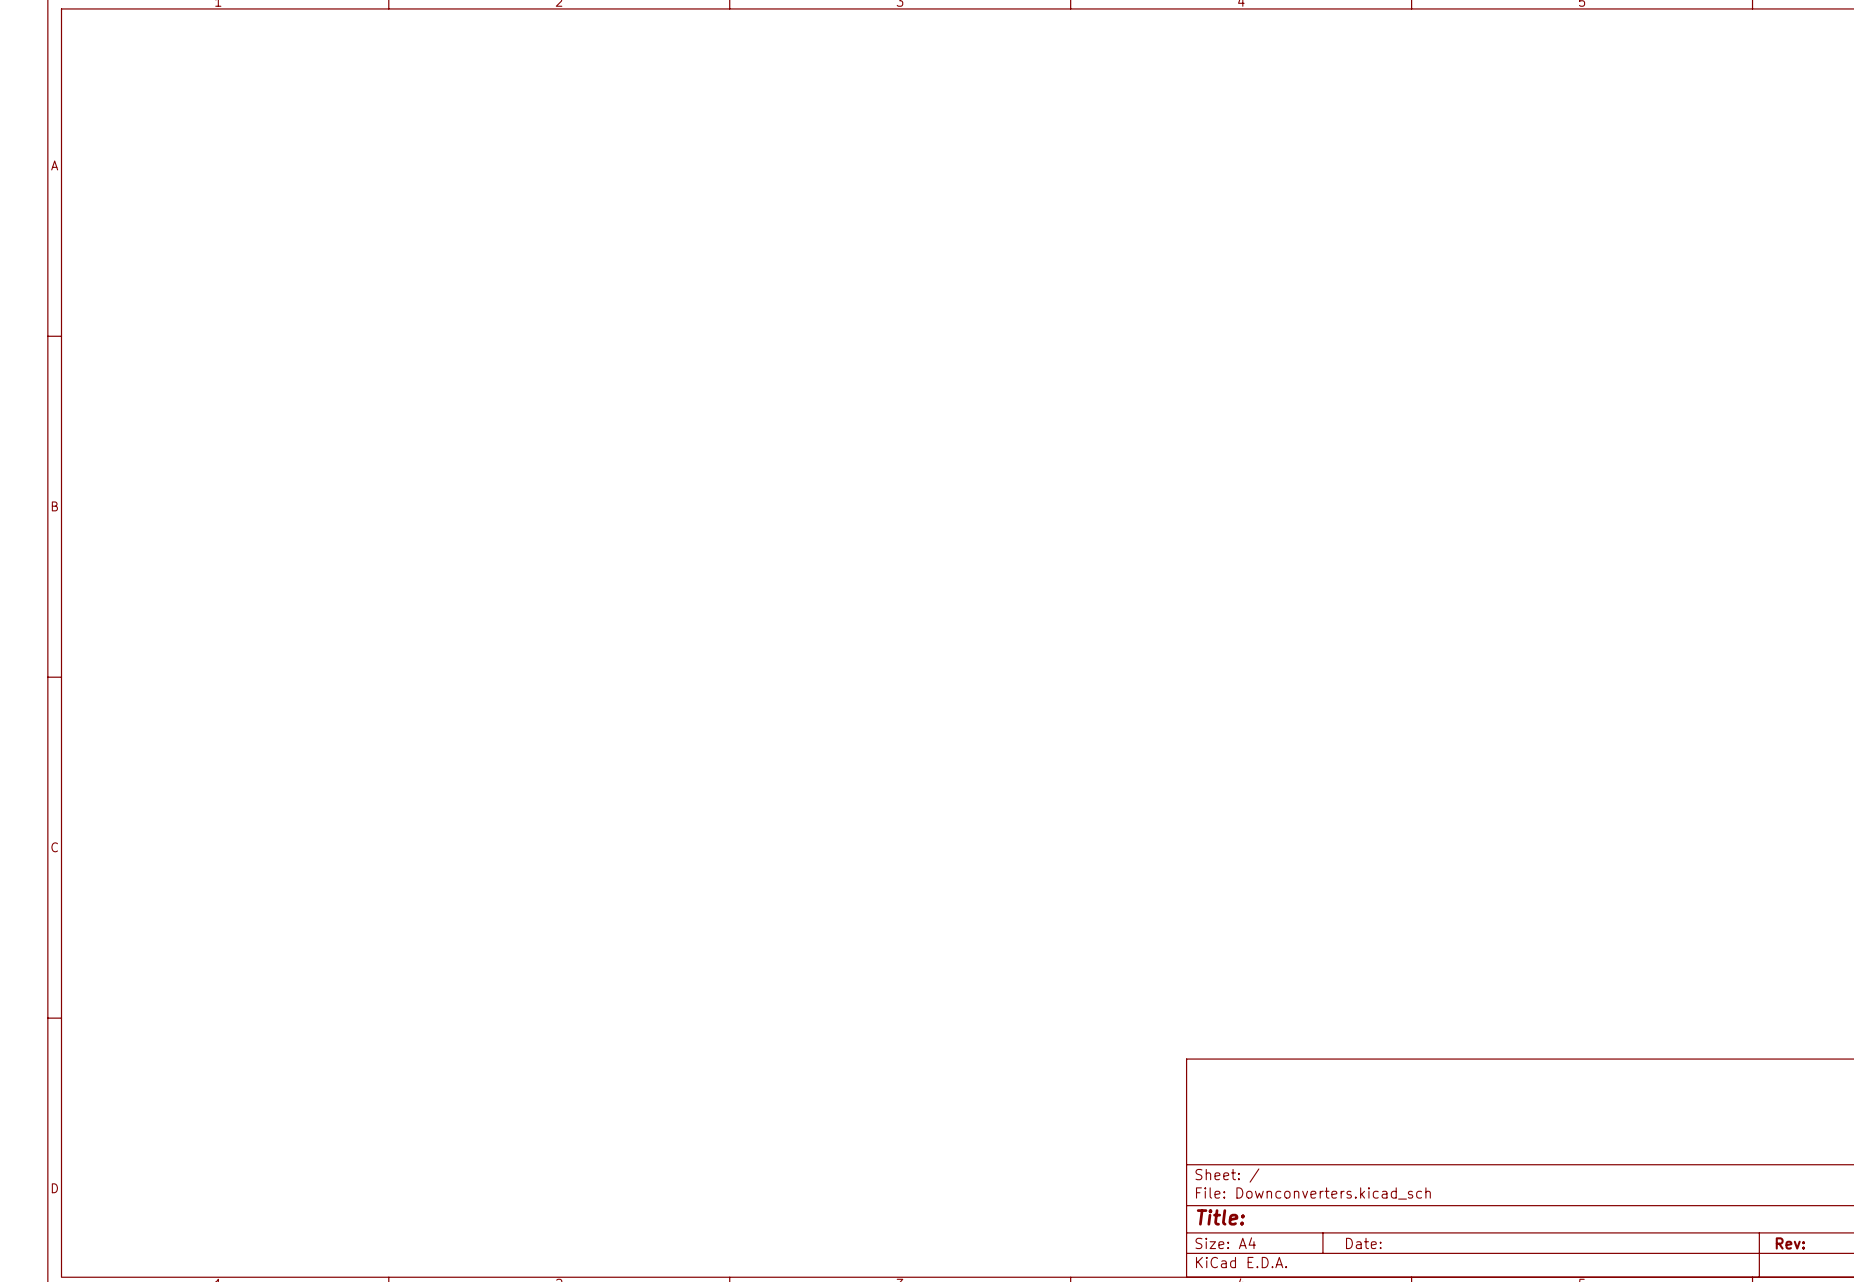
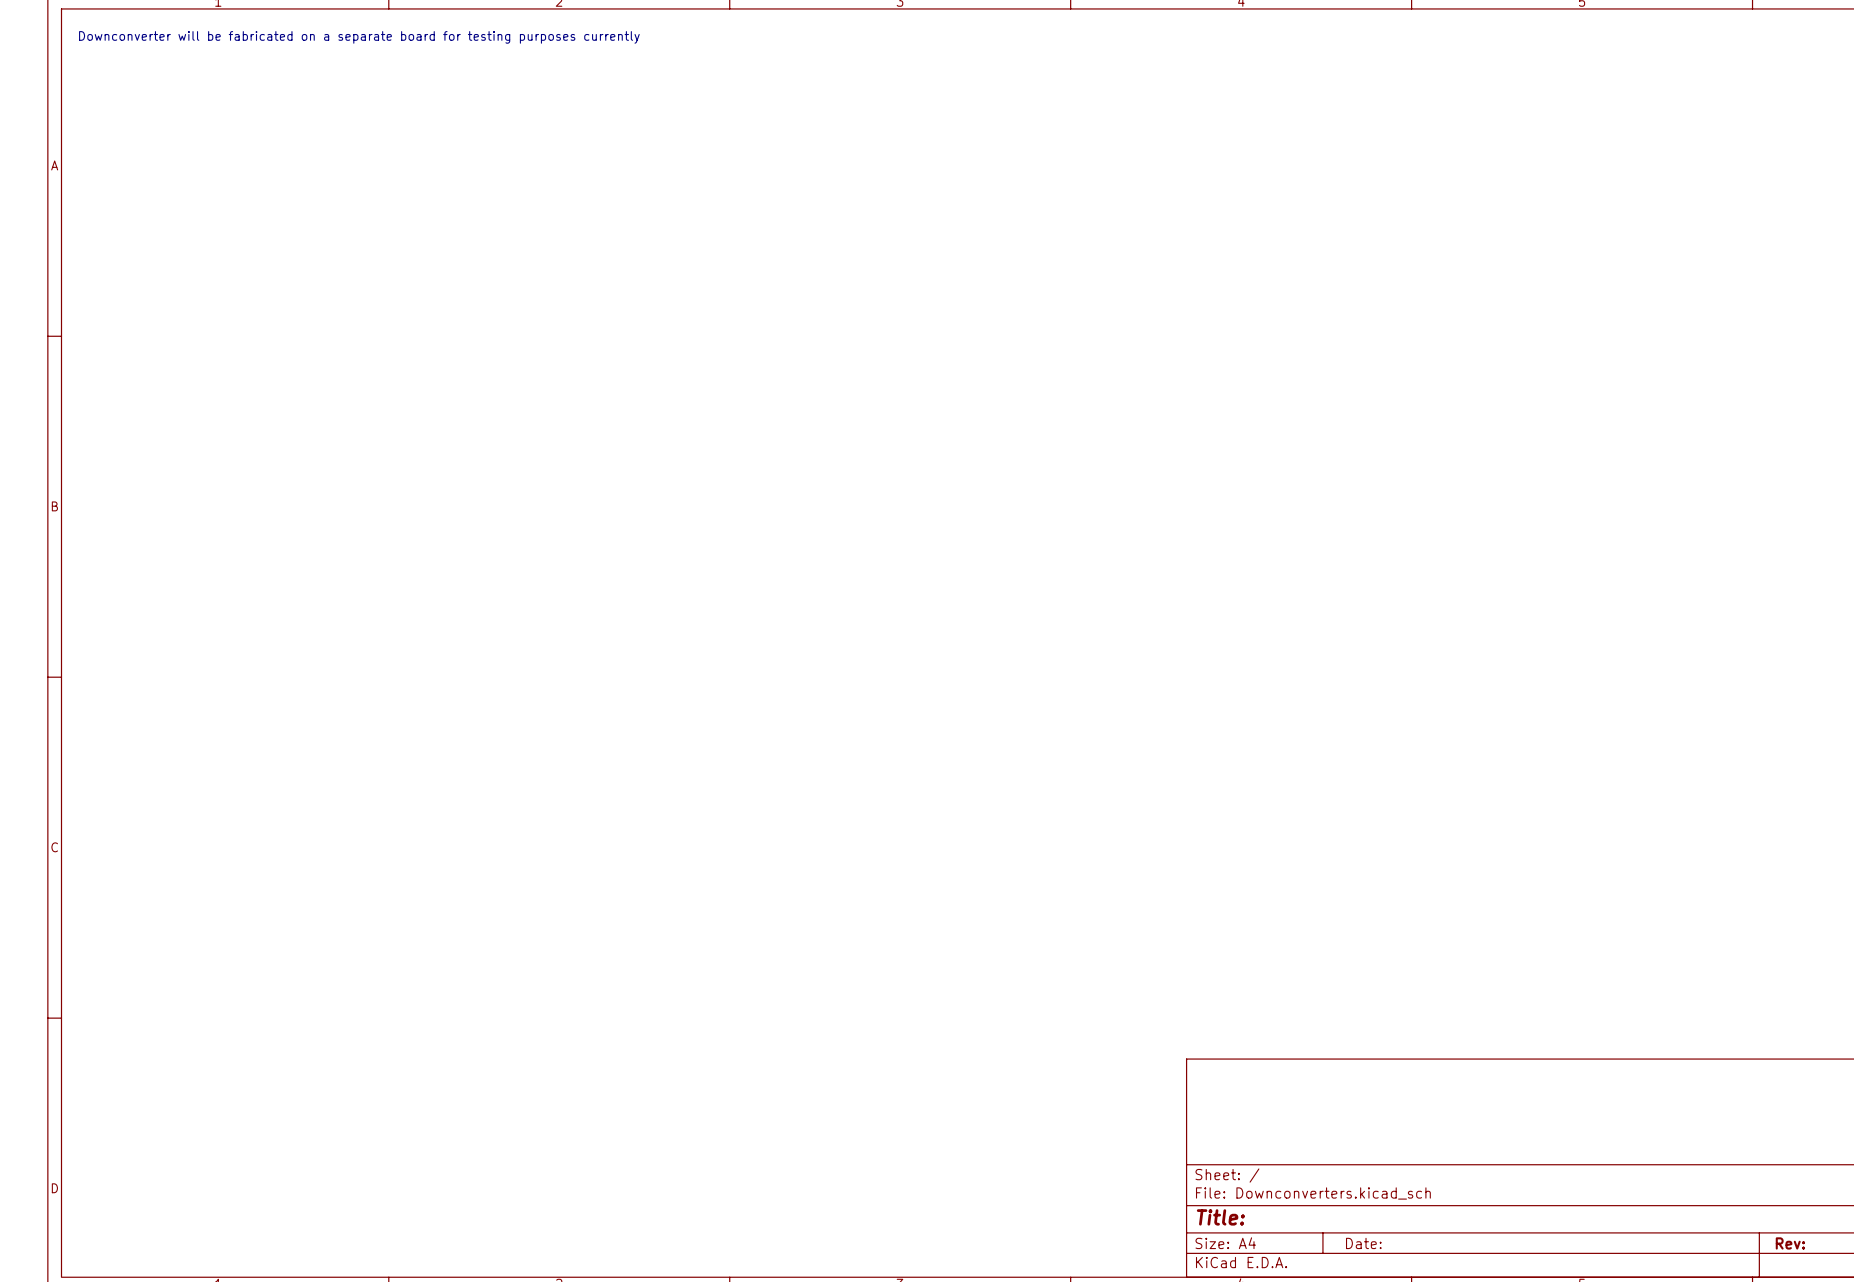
text: none -> Downconverter will be fabricated on a separate board for testing purposes currently (359, 37)

